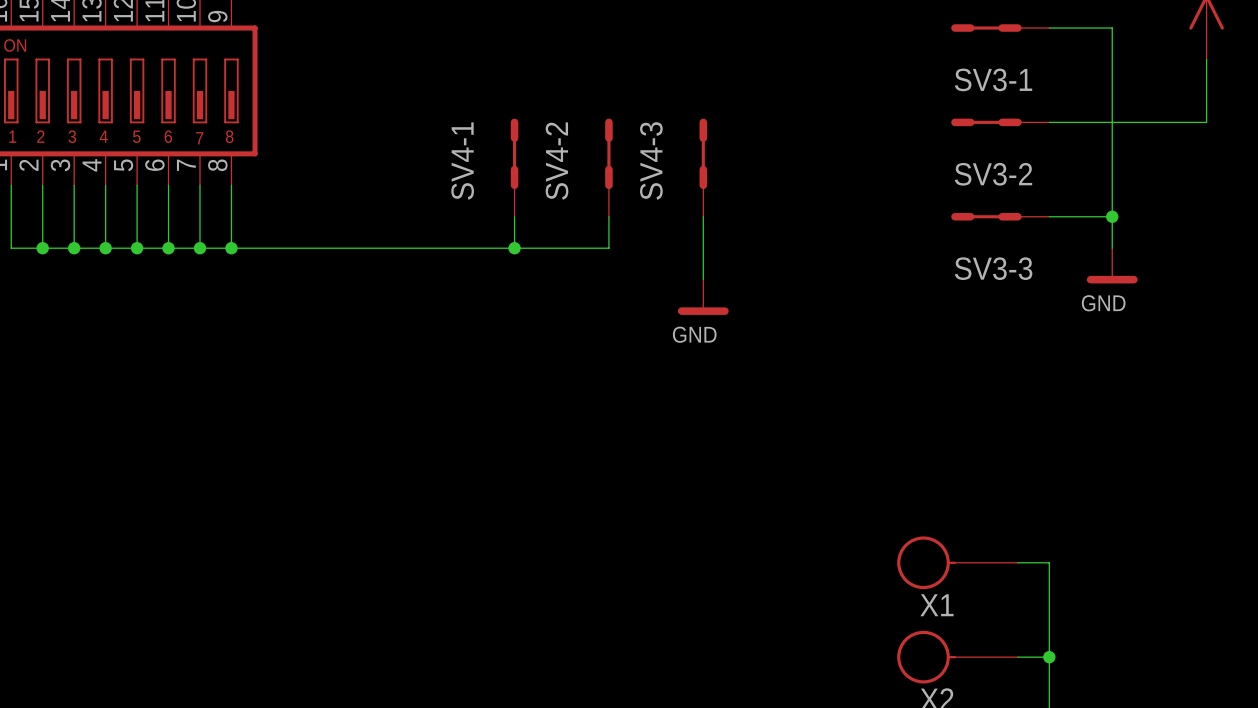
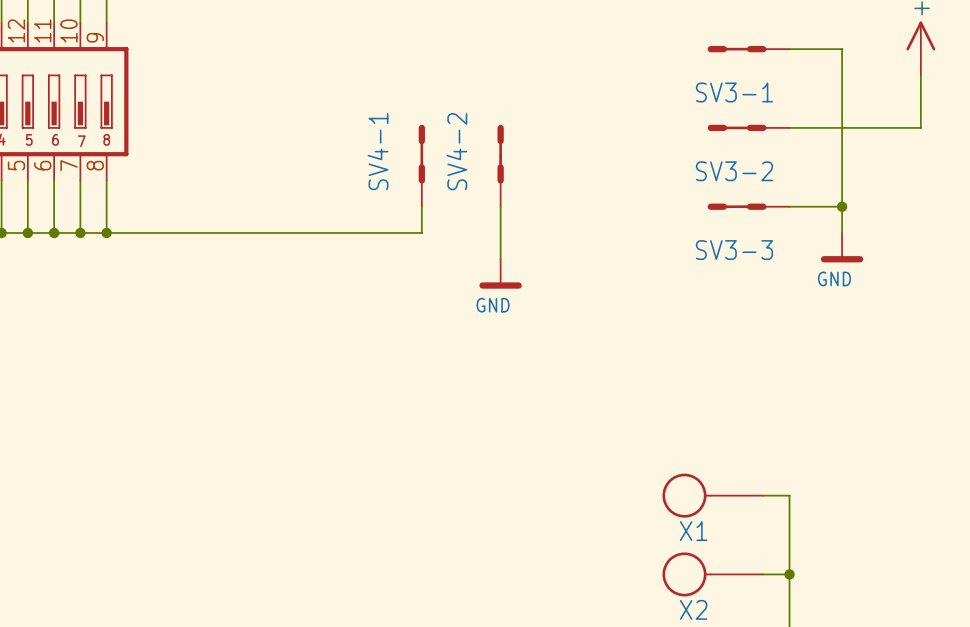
SV4-3 name: SV4-3 (651, 160) -> SV4-2 (456, 151)
SV4-2 name: SV4-2 (557, 161) -> SV4-1 (378, 151)
SV4-1: (514, 167) -> none
wire: (514, 216) (514, 248) -> none
junction: (514, 248) -> none

